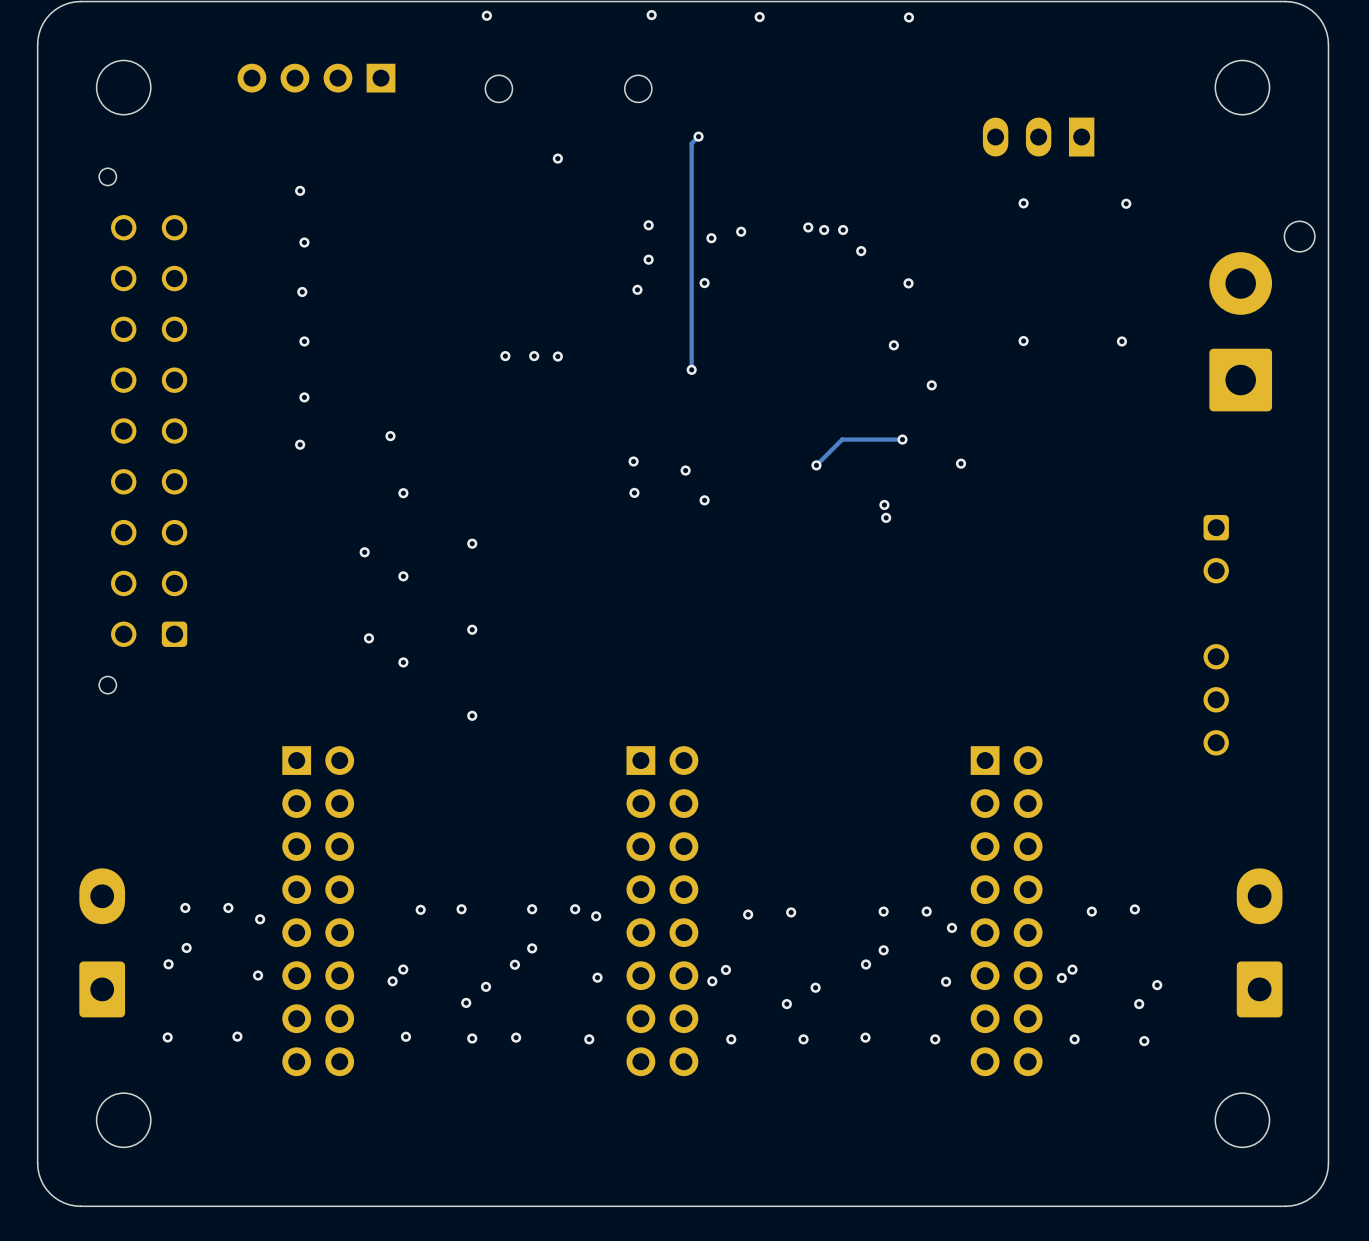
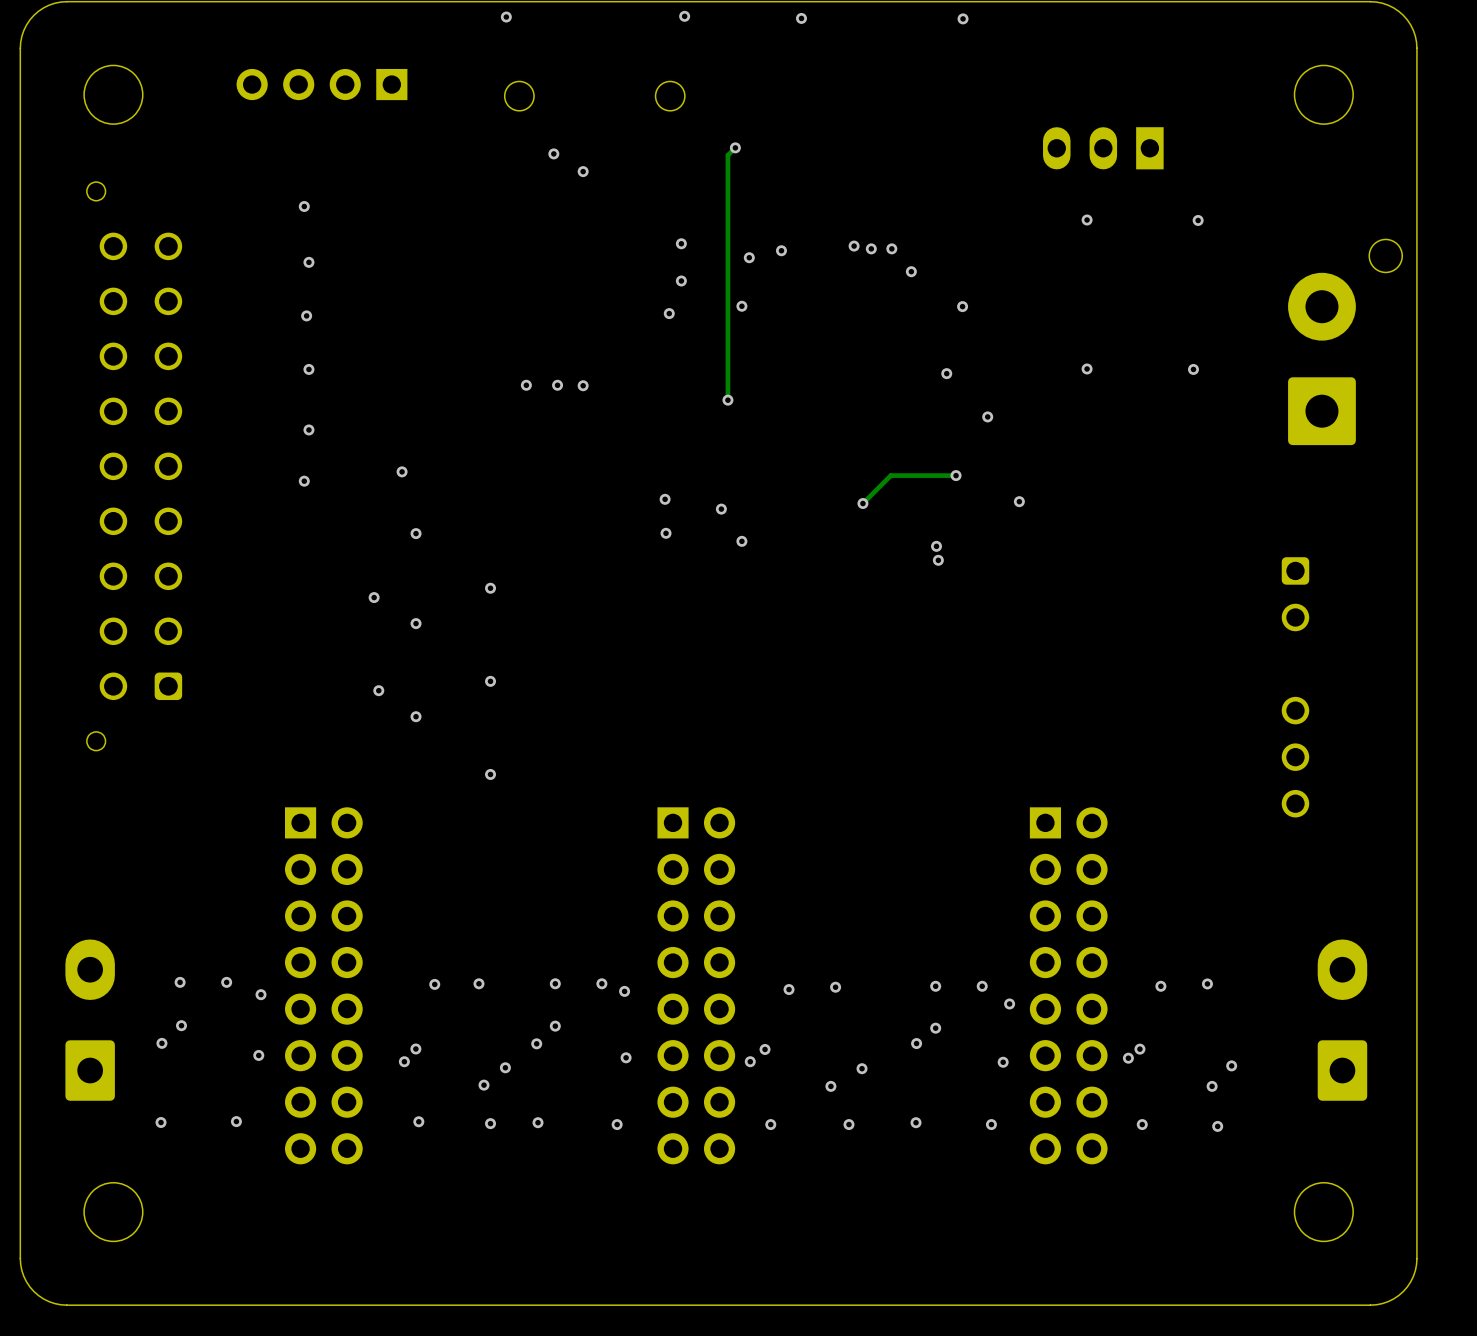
via: none -> (553, 153)

